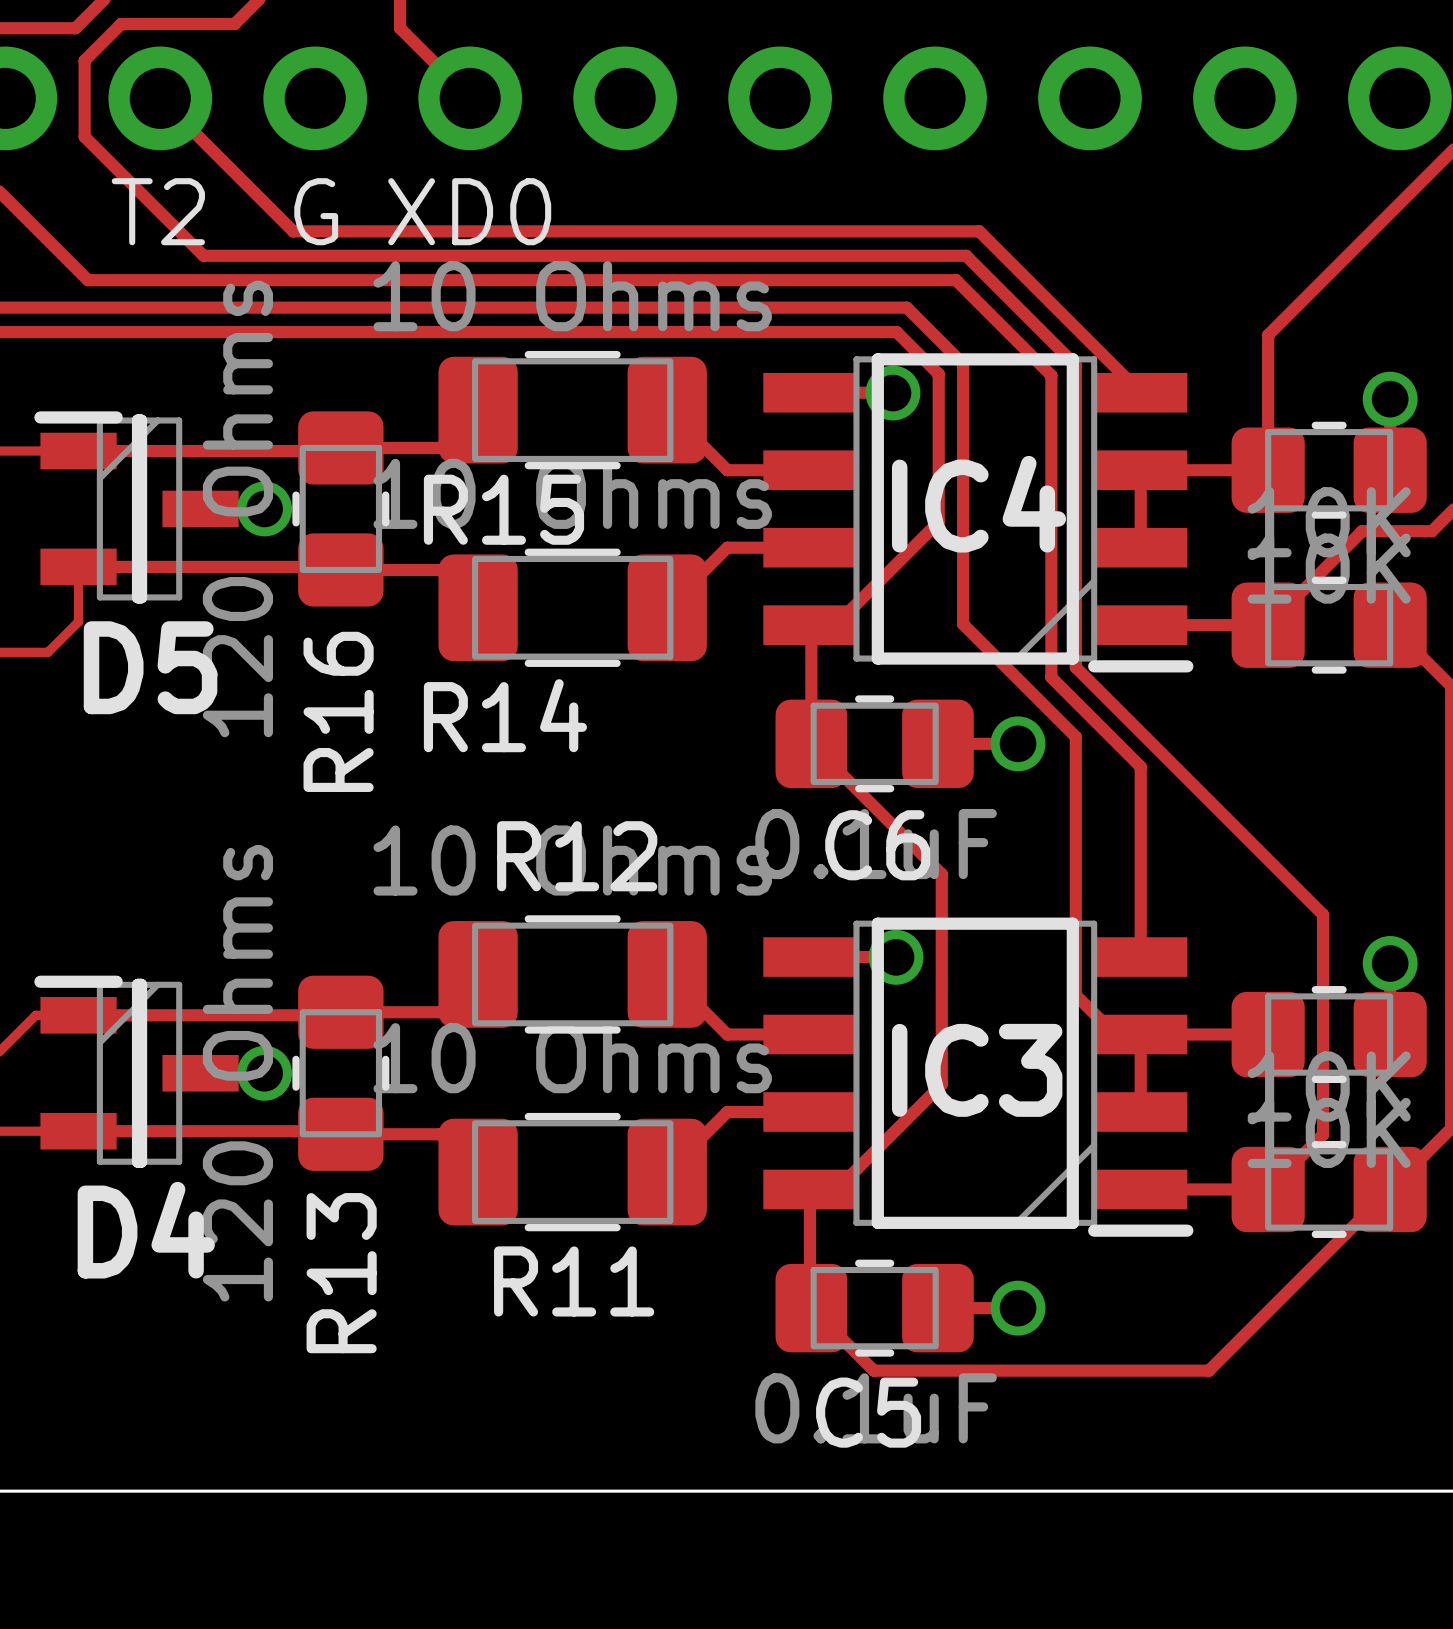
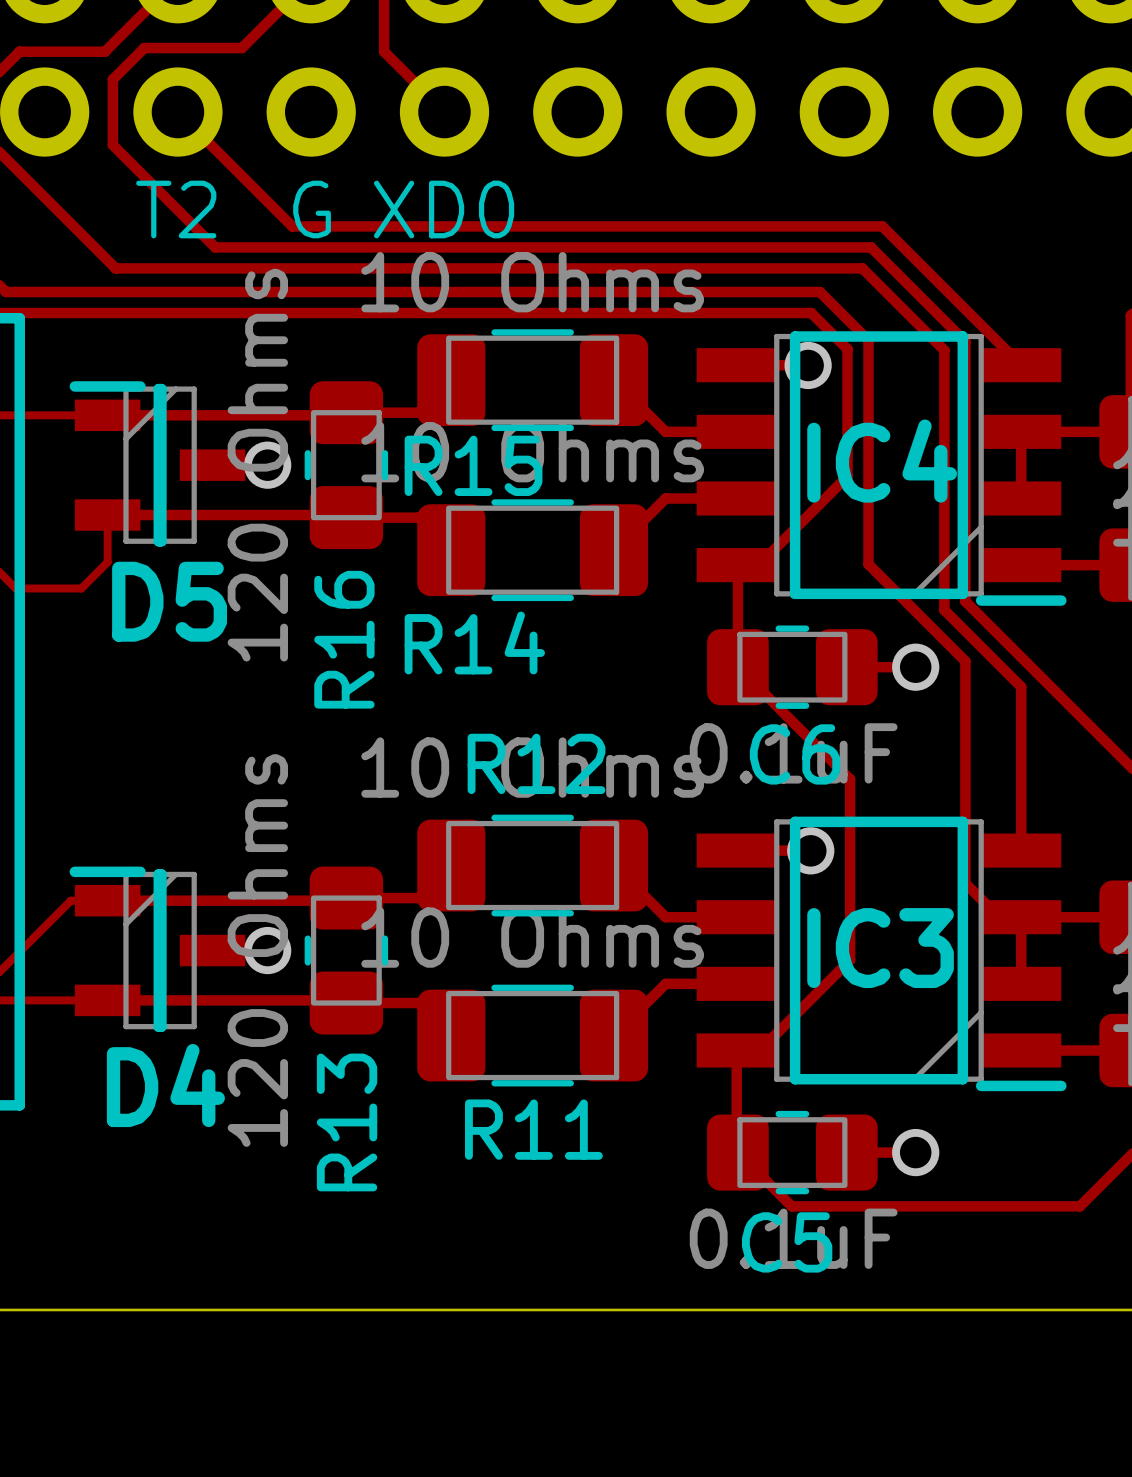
R16 position: (340, 508) -> (346, 465)
R13 position: (340, 1073) -> (346, 950)

